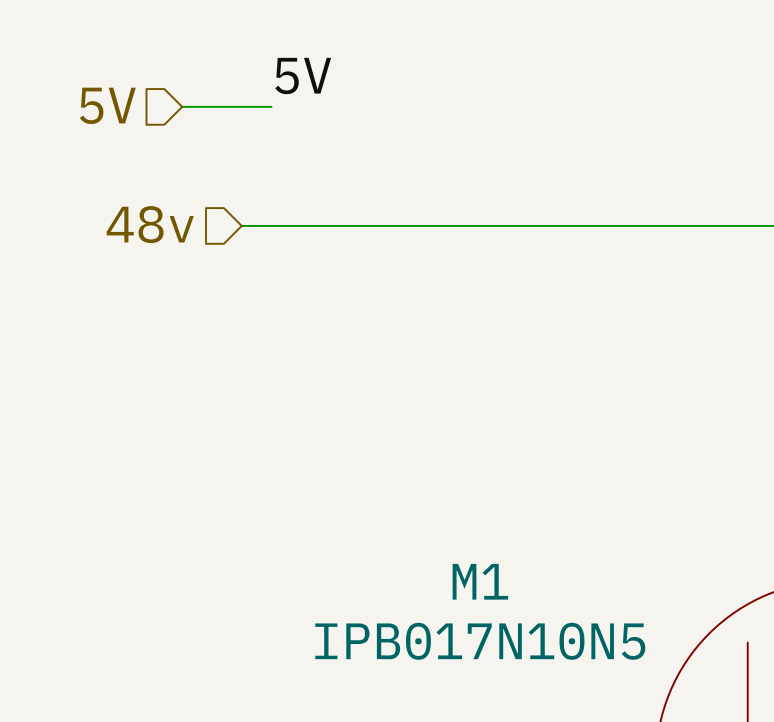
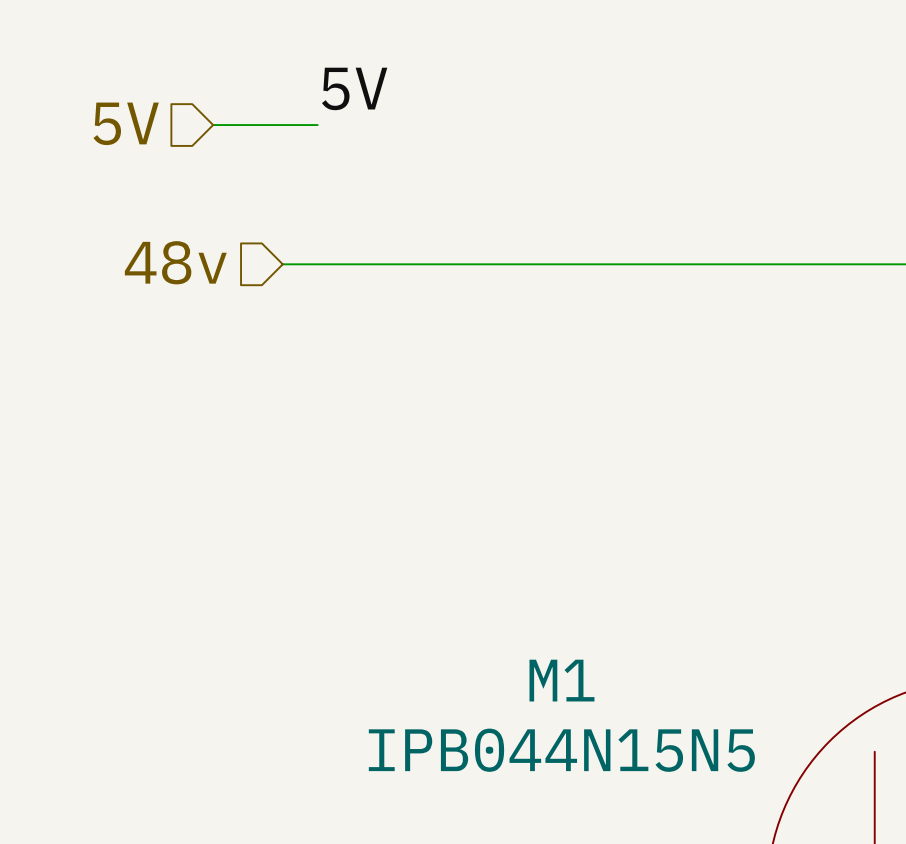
M1 value: IPB017N10N5 (480, 641) -> IPB044N15N5 (561, 750)

